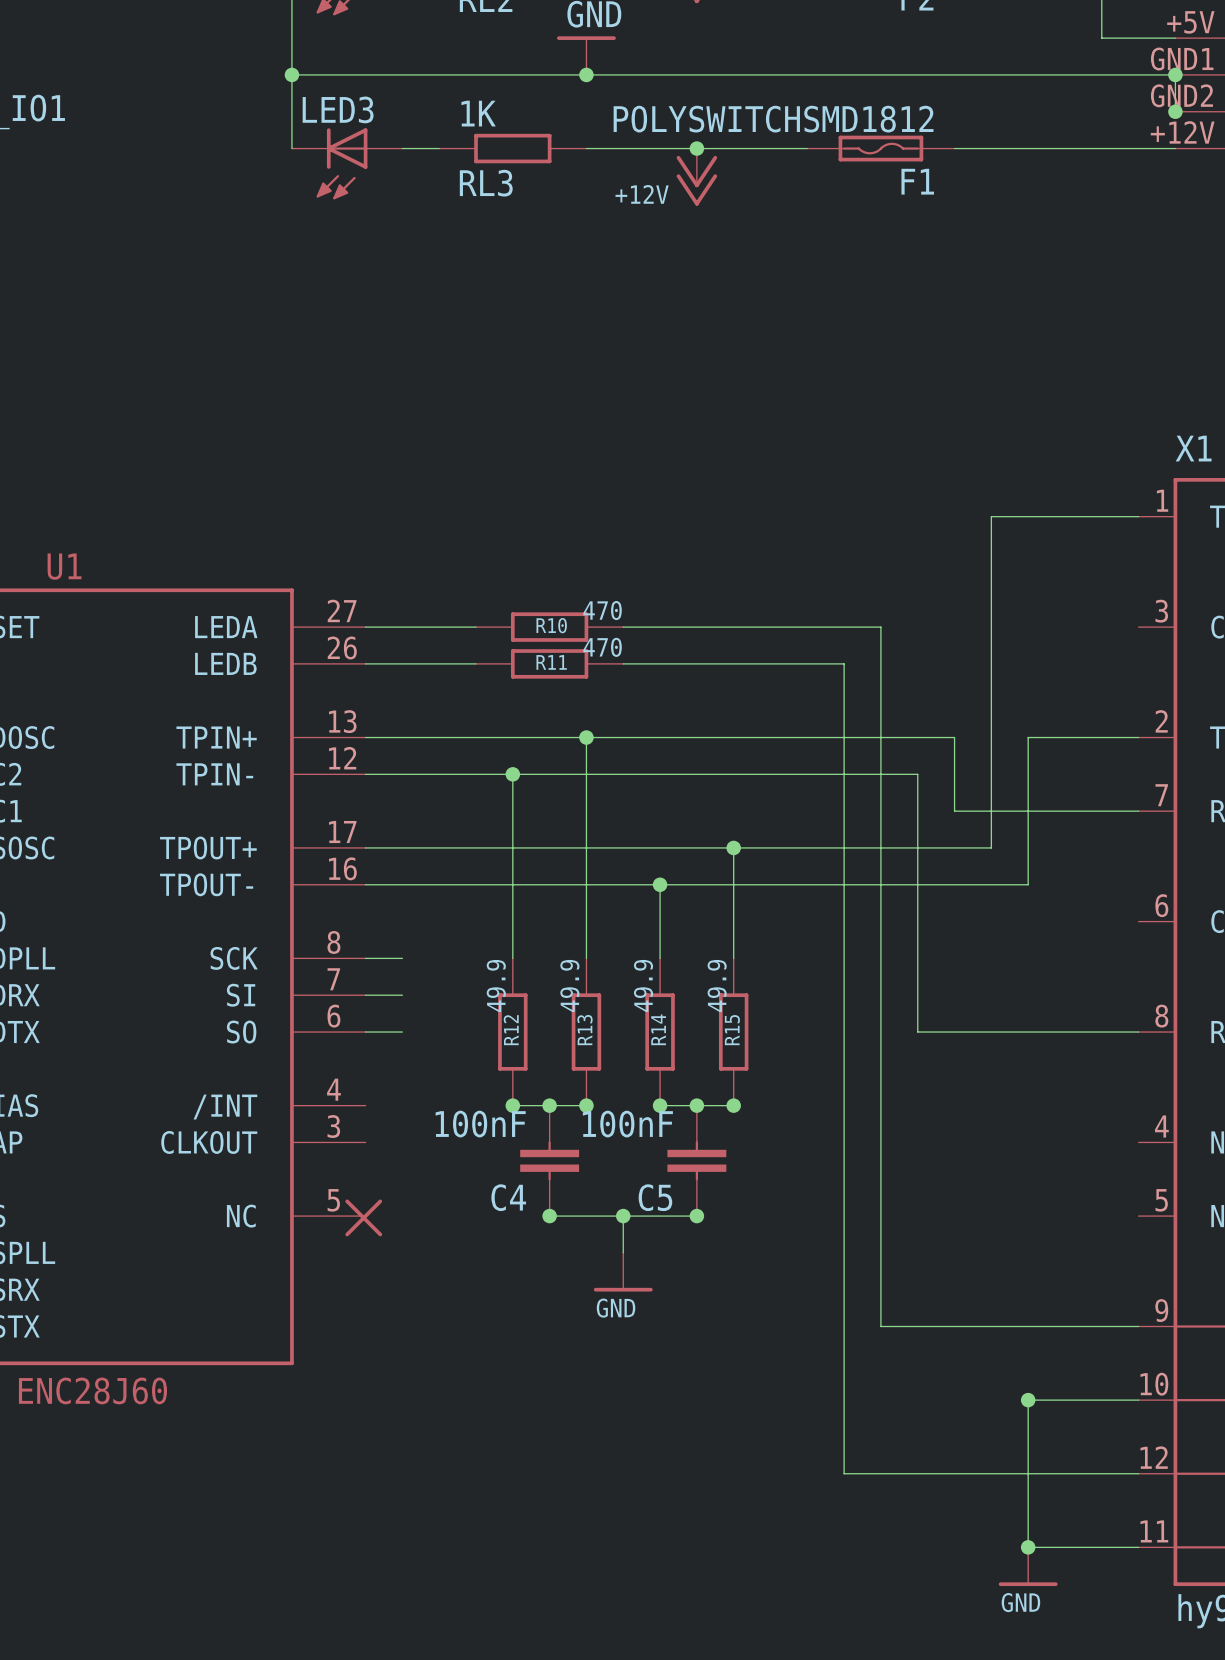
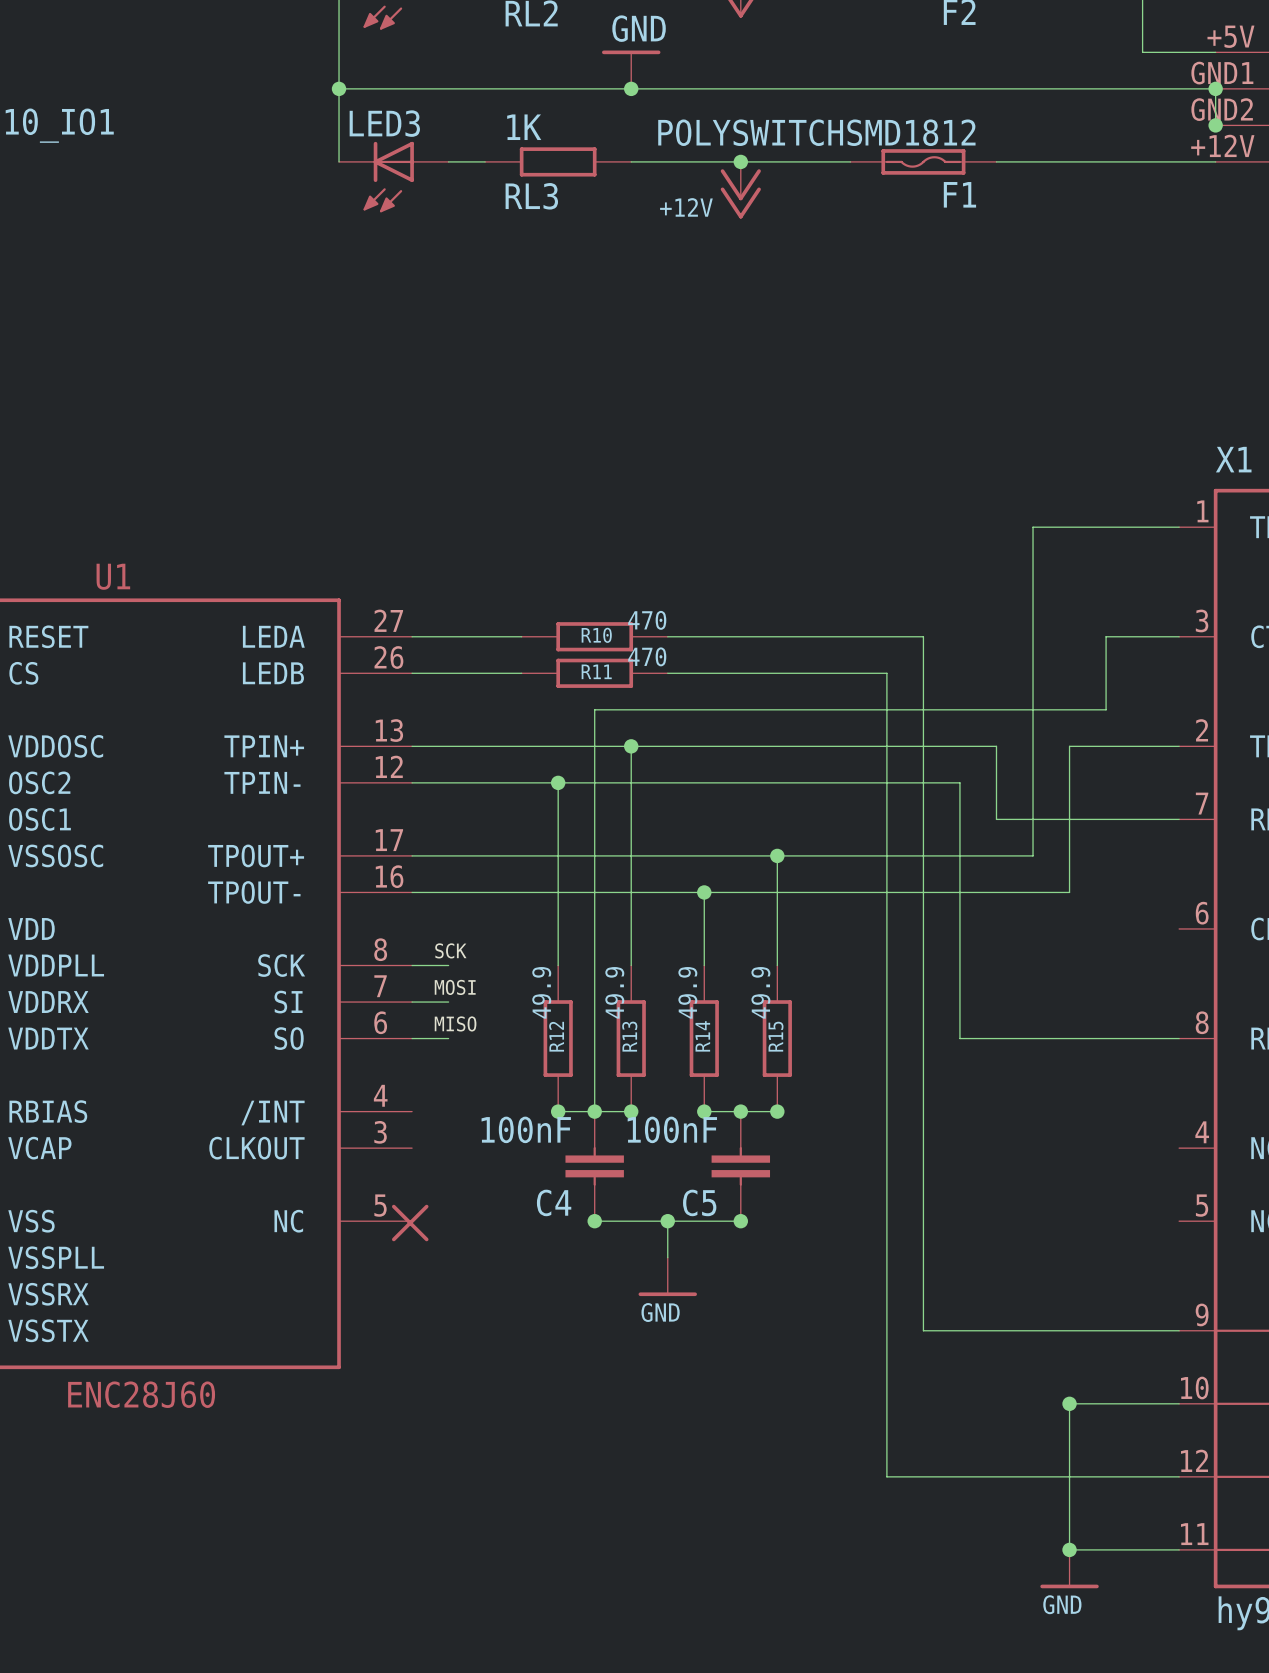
wire: none -> (1179, 636) (1106, 636) (1106, 709) (594, 709) (594, 1111)
label: none -> SCK (450, 950)
label: none -> MOSI (455, 987)
label: none -> MISO (455, 1023)

